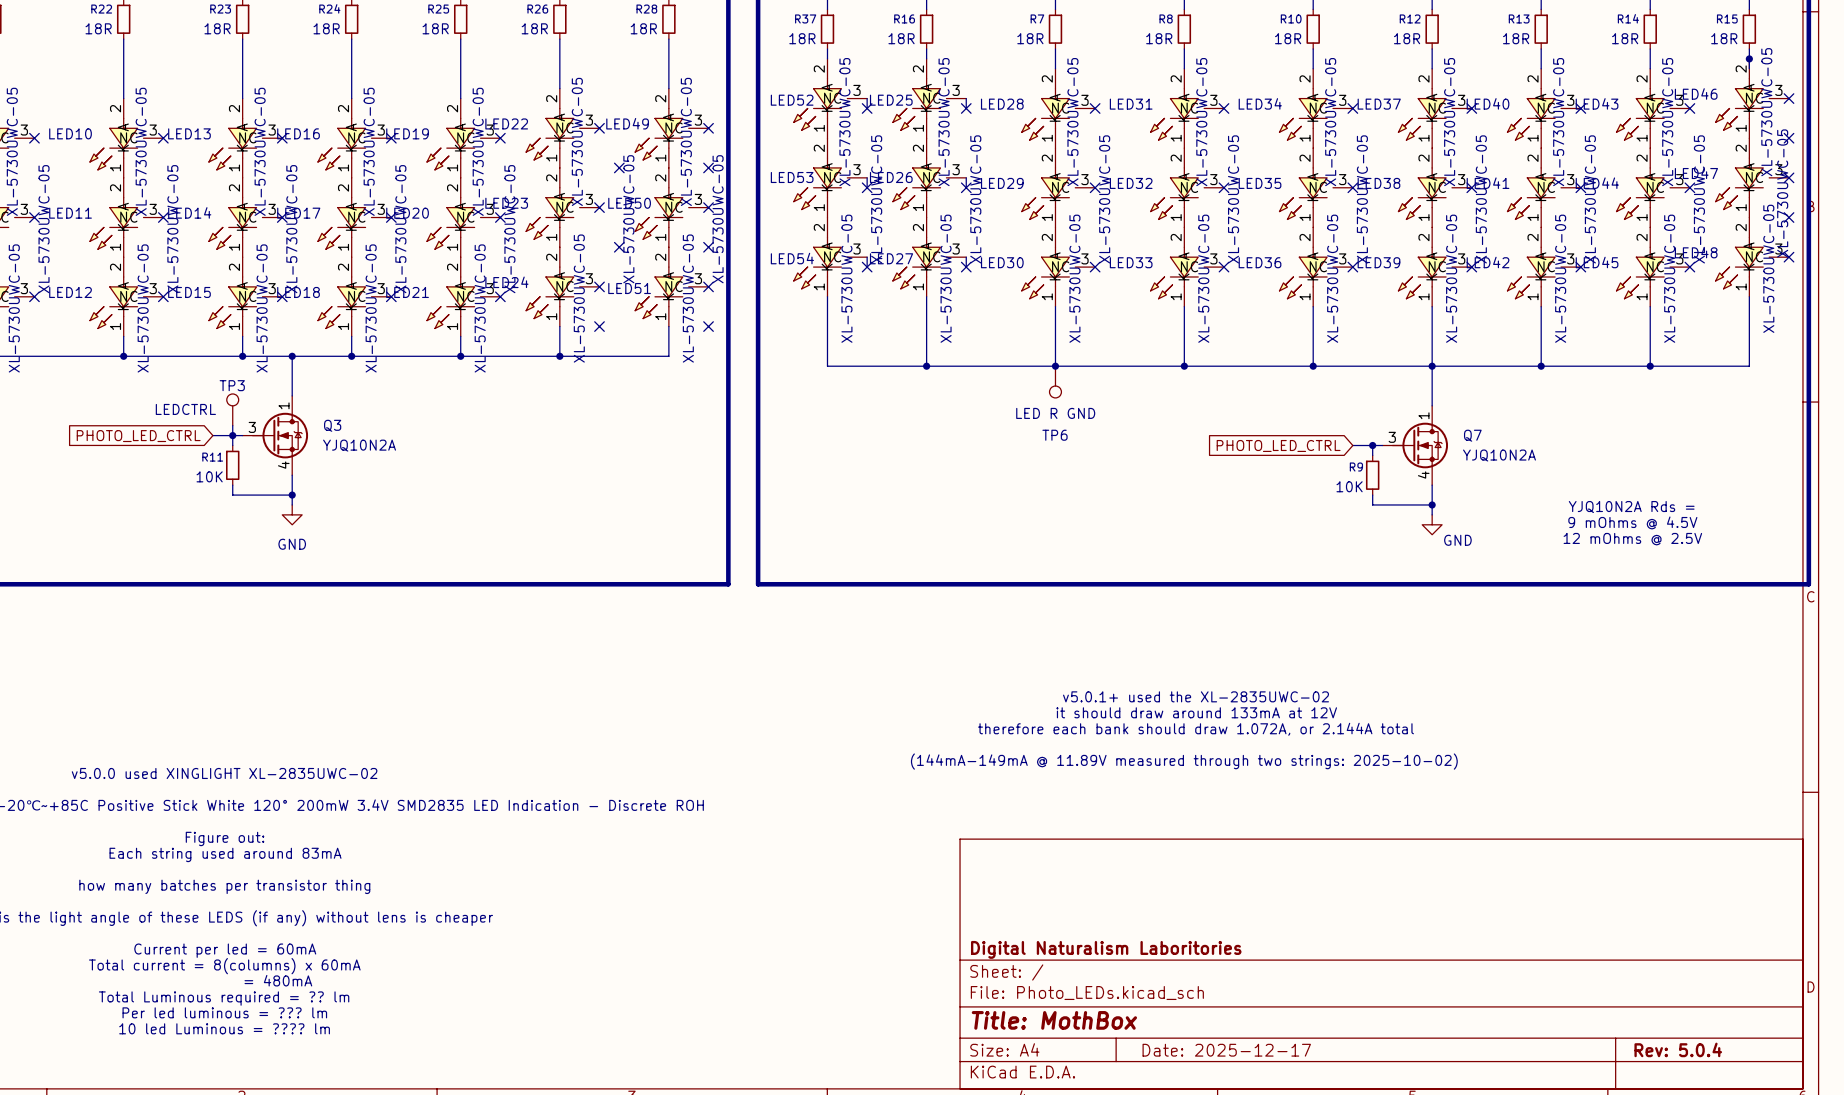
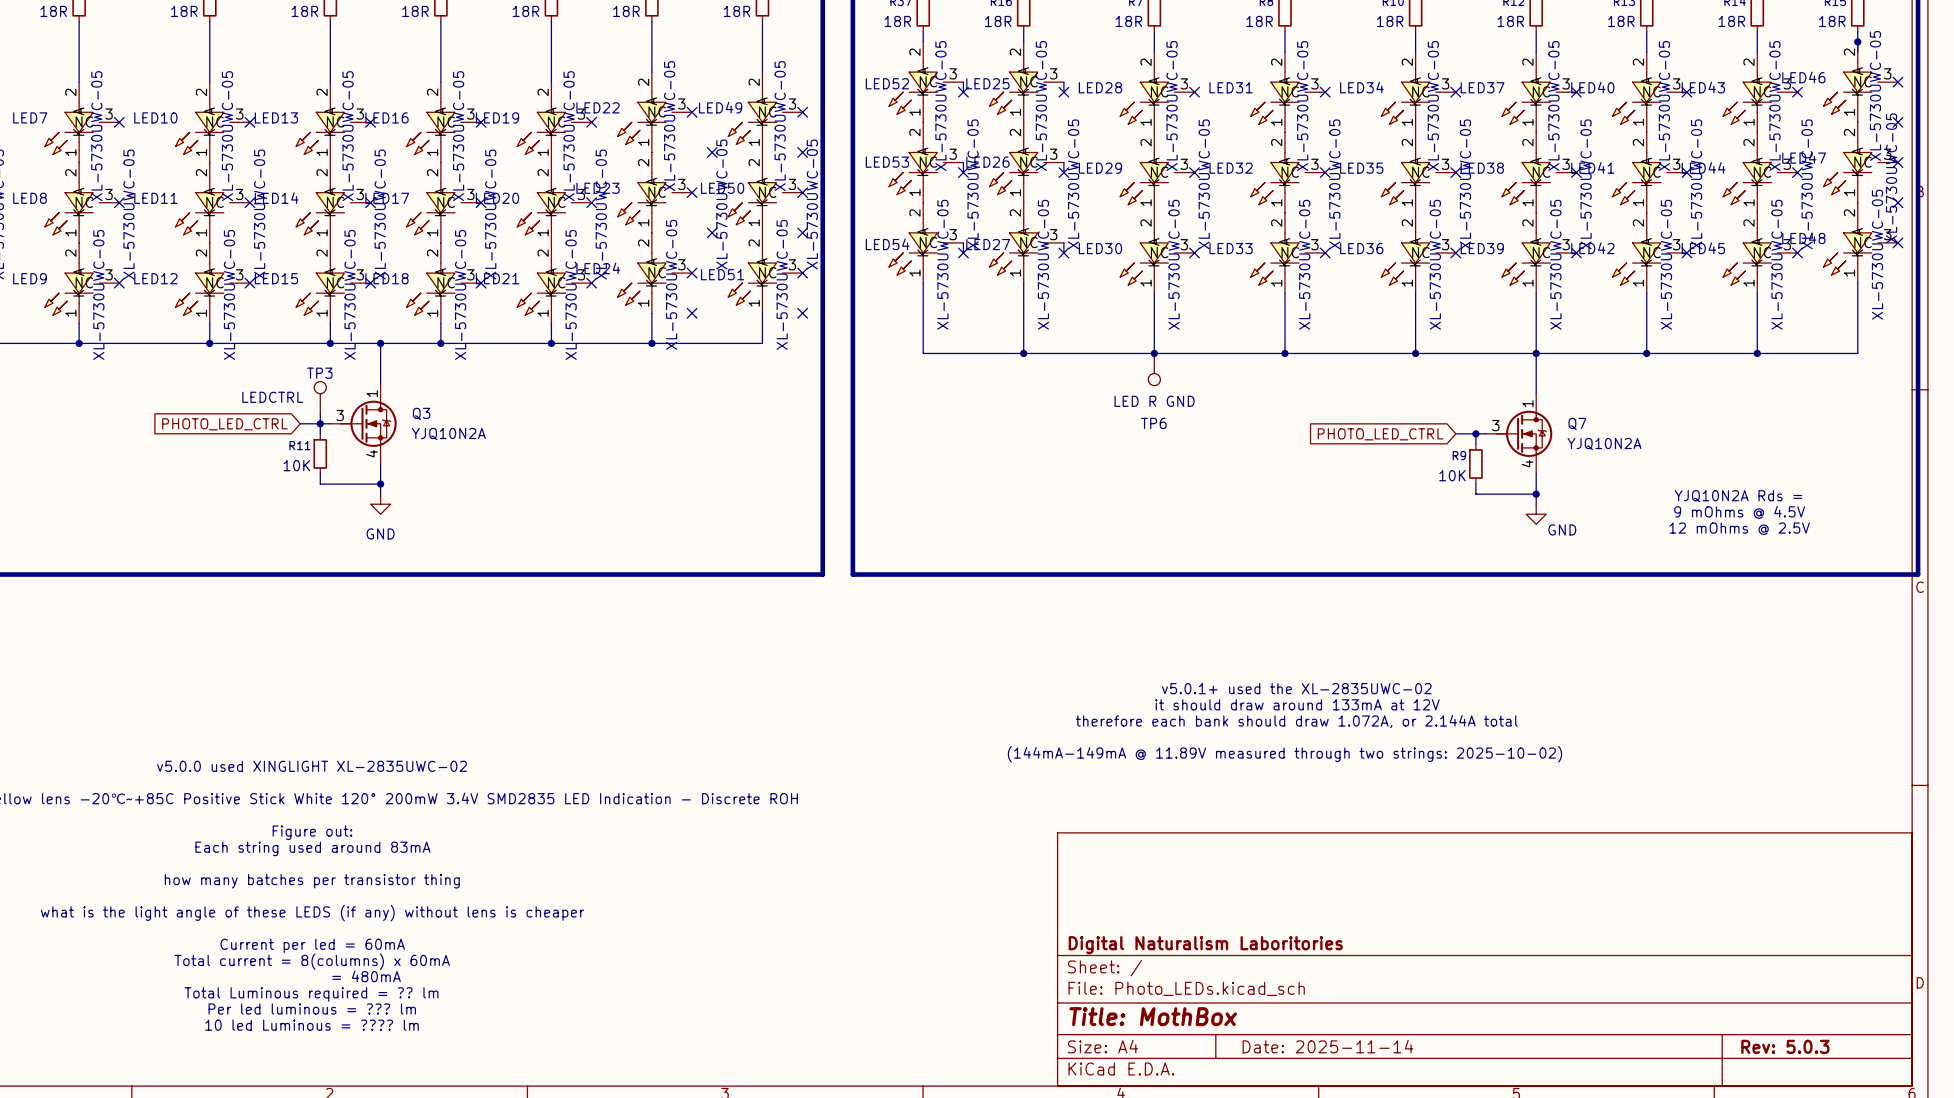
title block: Rev: 5.0.4 (1678, 1049) -> Rev: 5.0.3 (1785, 1046)
title block: Date: 2025-12-17 (1226, 1050) -> Date: 2025-11-14 (1327, 1046)

